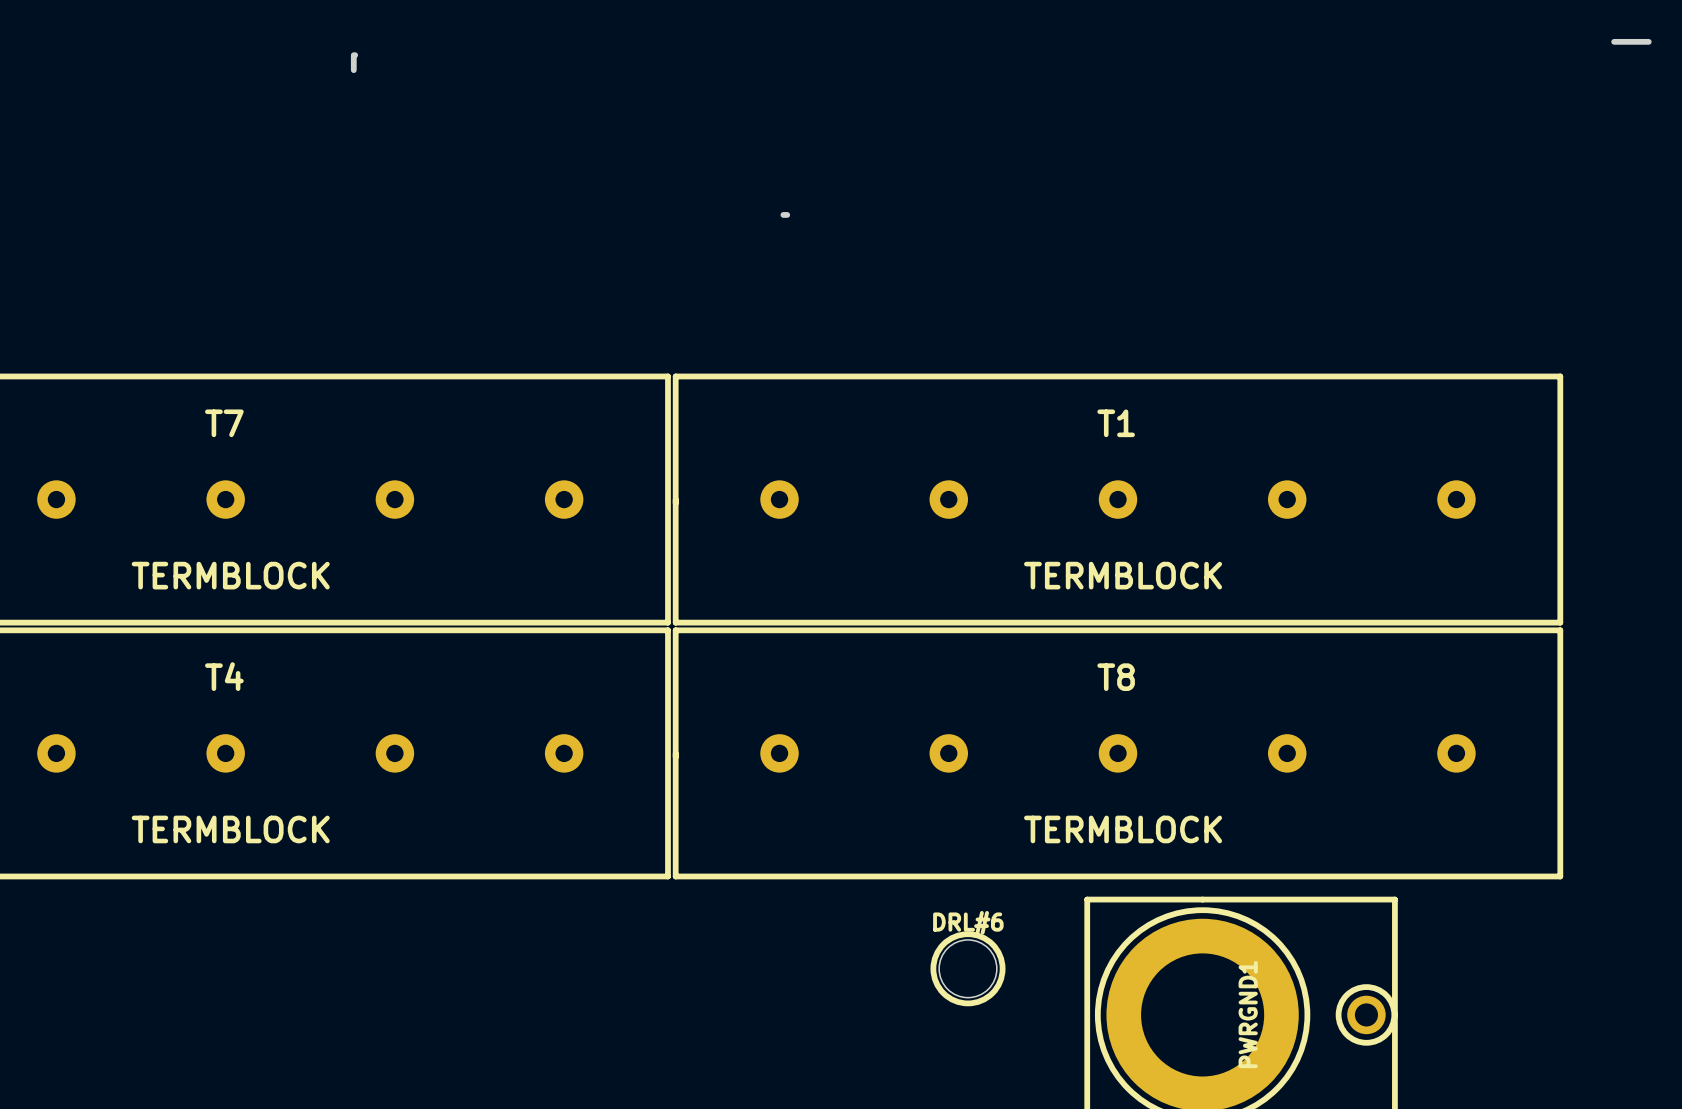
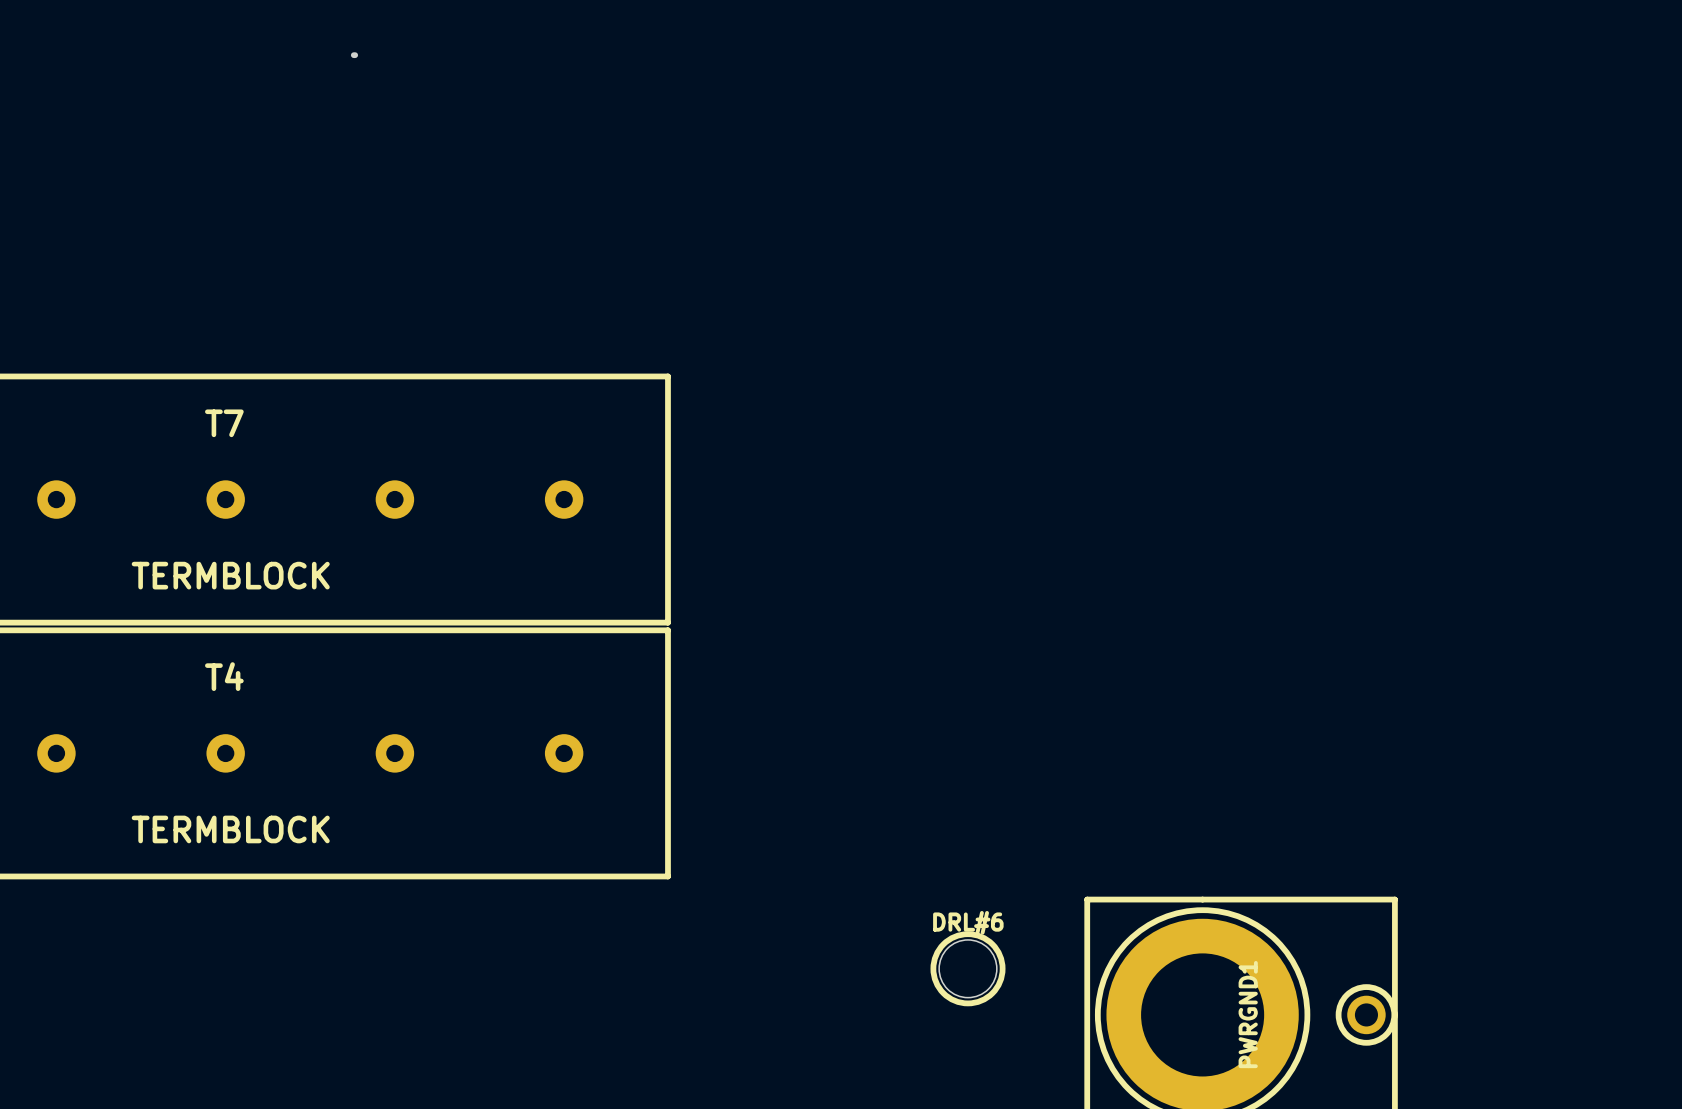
board edge: (1614, 41) (1648, 41) -> none
board edge: (353, 56) (353, 70) -> none
board edge: (783, 214) (787, 214) -> none
T1: TERMBLOCK (1117, 499) -> none
T8: TERMBLOCK (1117, 753) -> none

